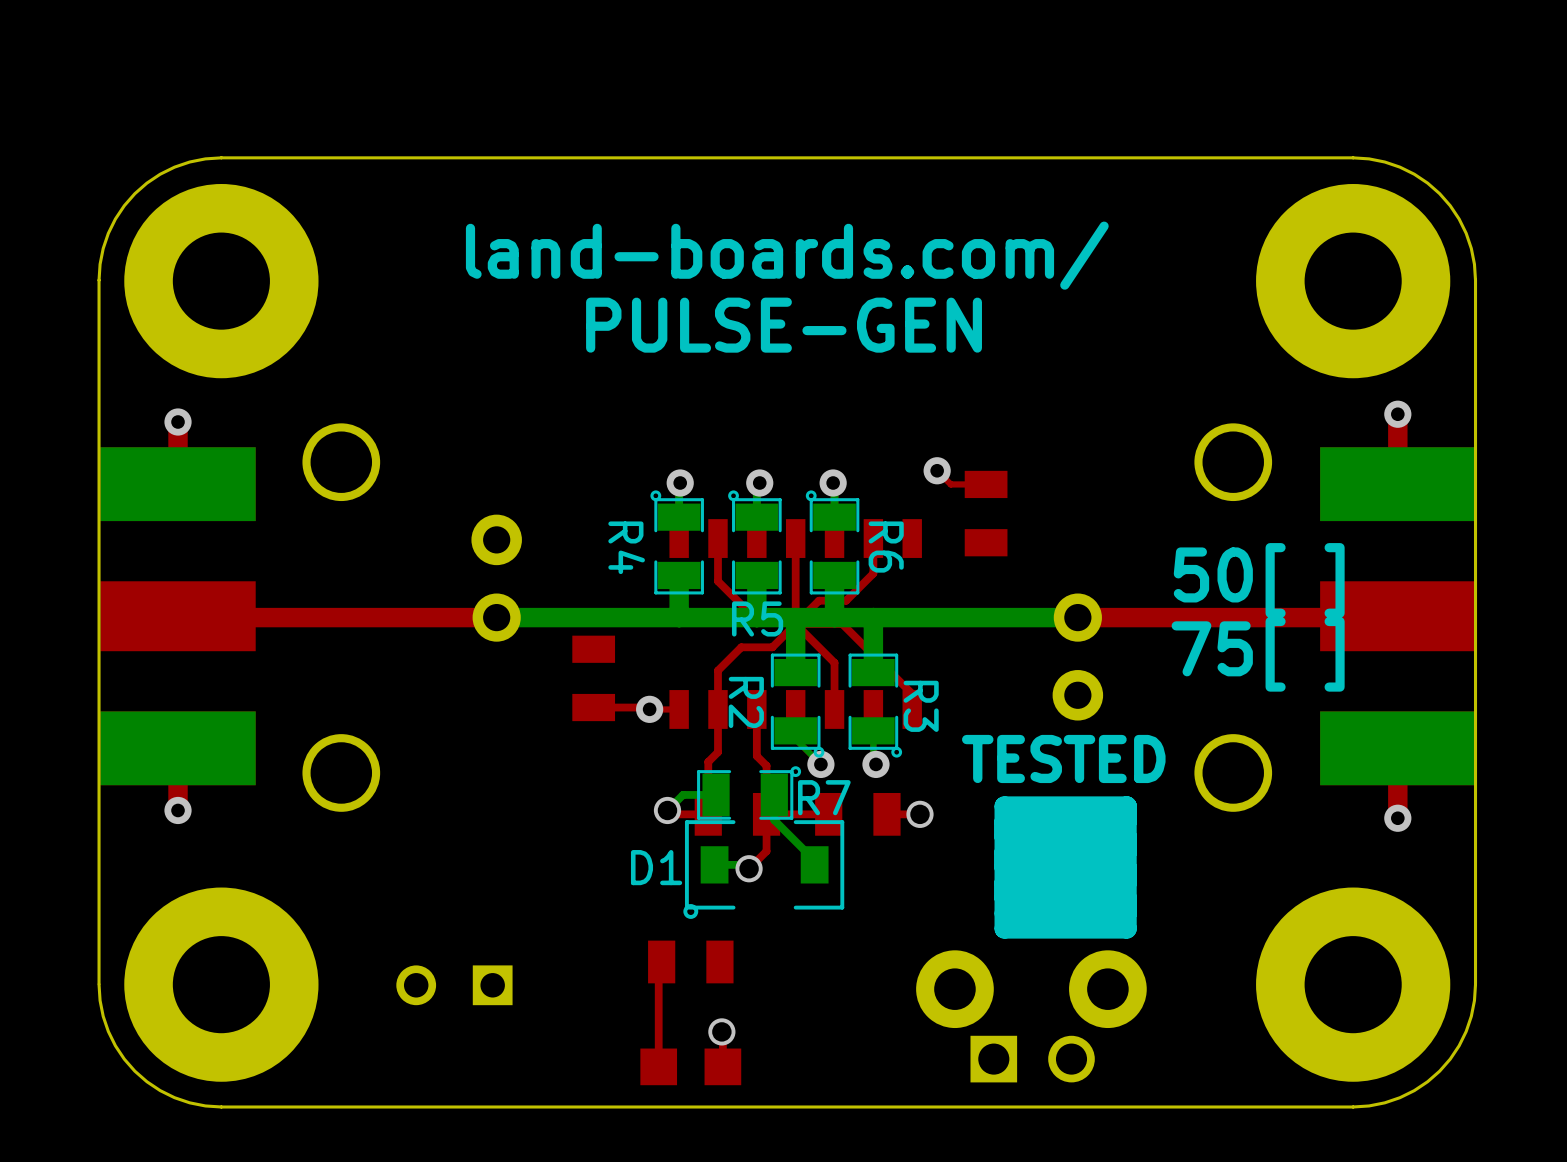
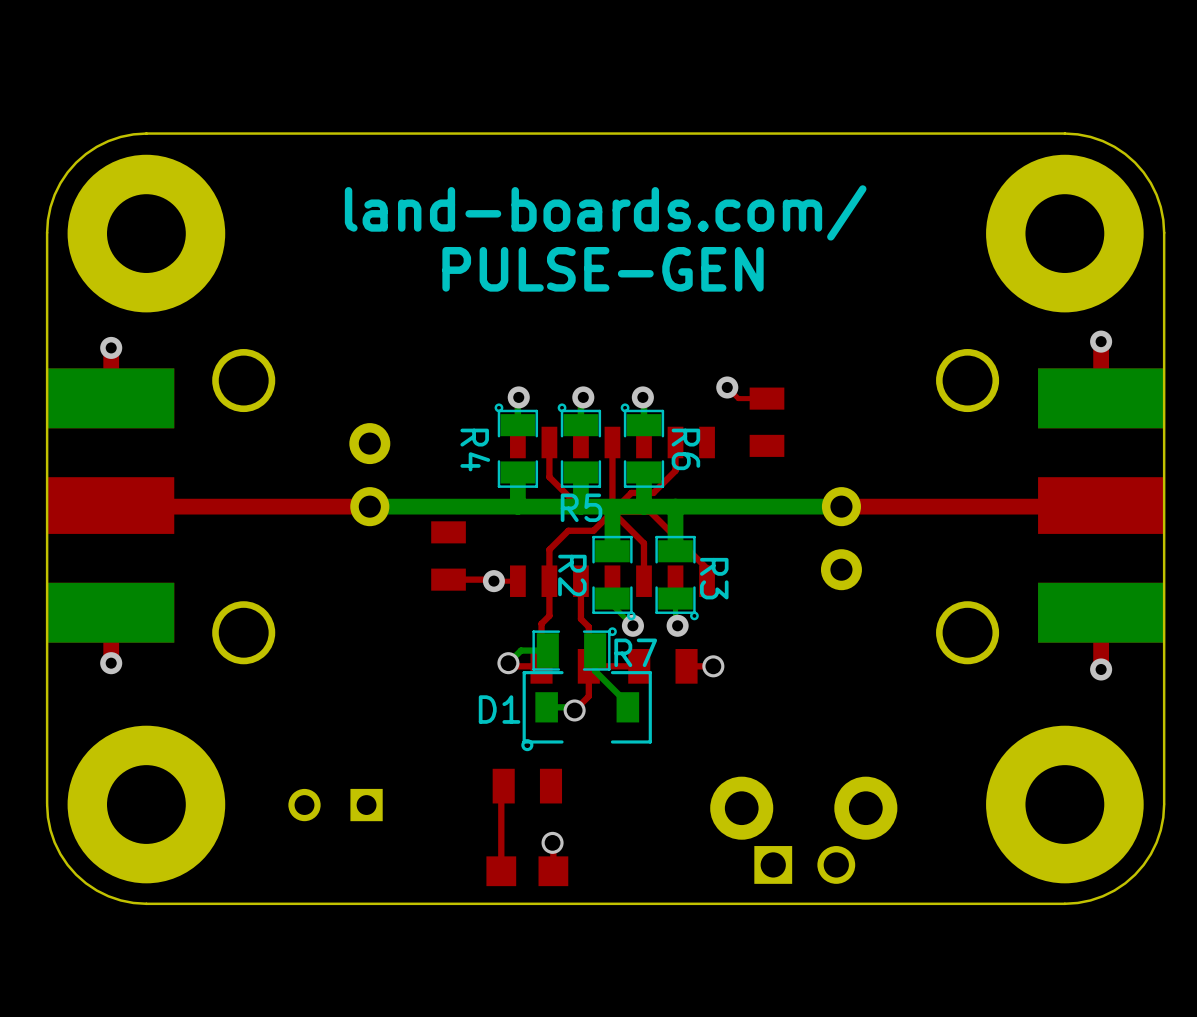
text: 50[ ] (1259, 580) -> none
text: 75[ ] (1258, 654) -> none
TESTED: (1065, 867) -> none

